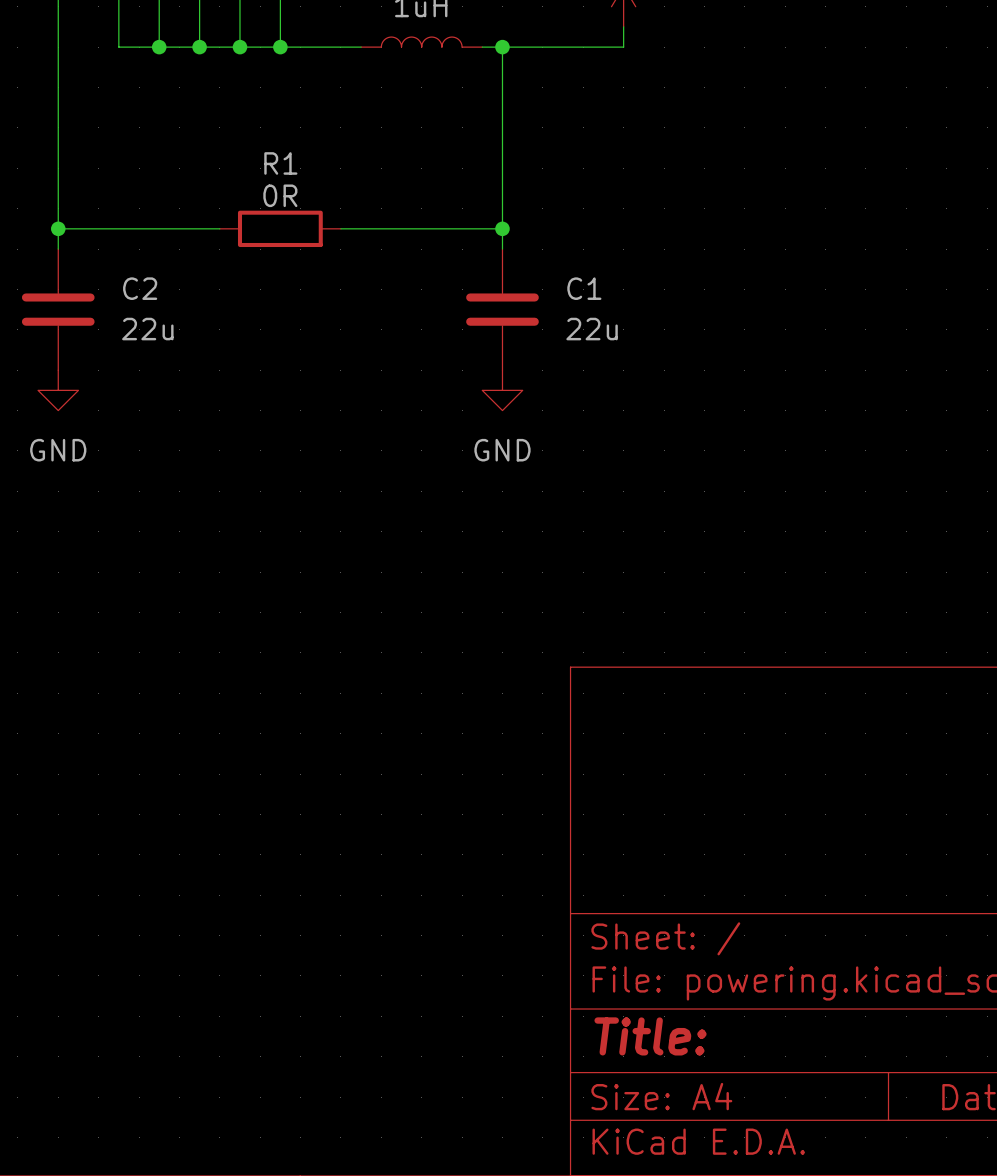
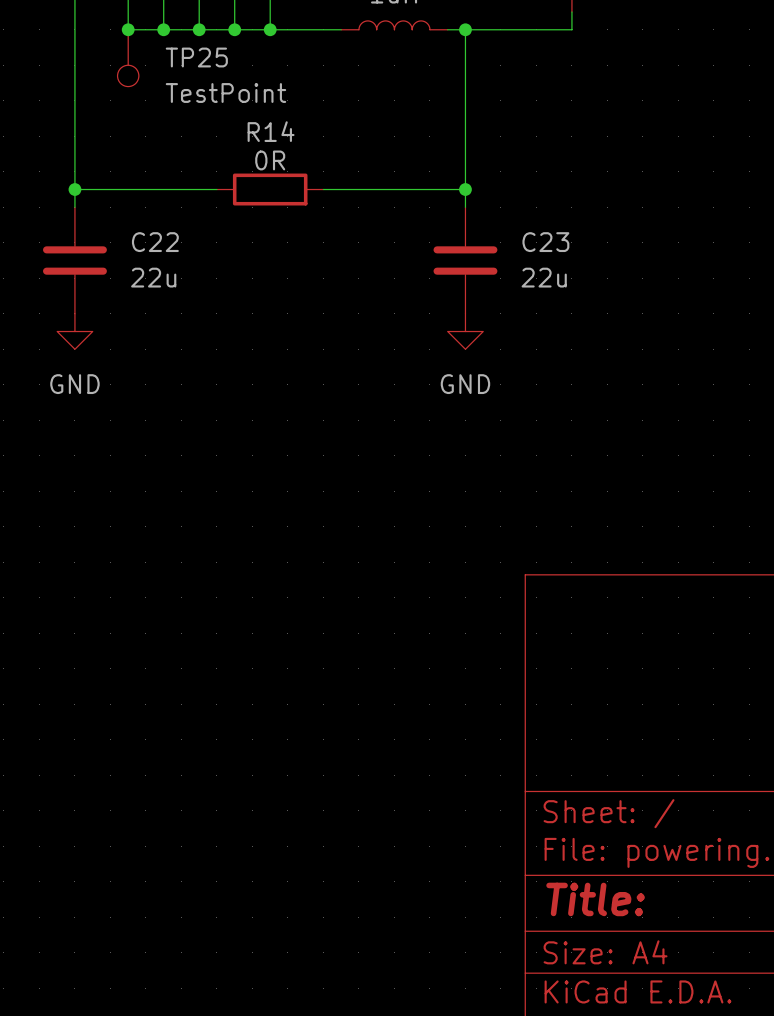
junction: none -> (128, 29)
TP25: none -> TestPoint (128, 58)
R1 name: R1 (280, 163) -> R14 (271, 131)
C2 name: C2 (140, 288) -> C22 (155, 242)
C1 name: C1 (584, 288) -> C23 (545, 242)

